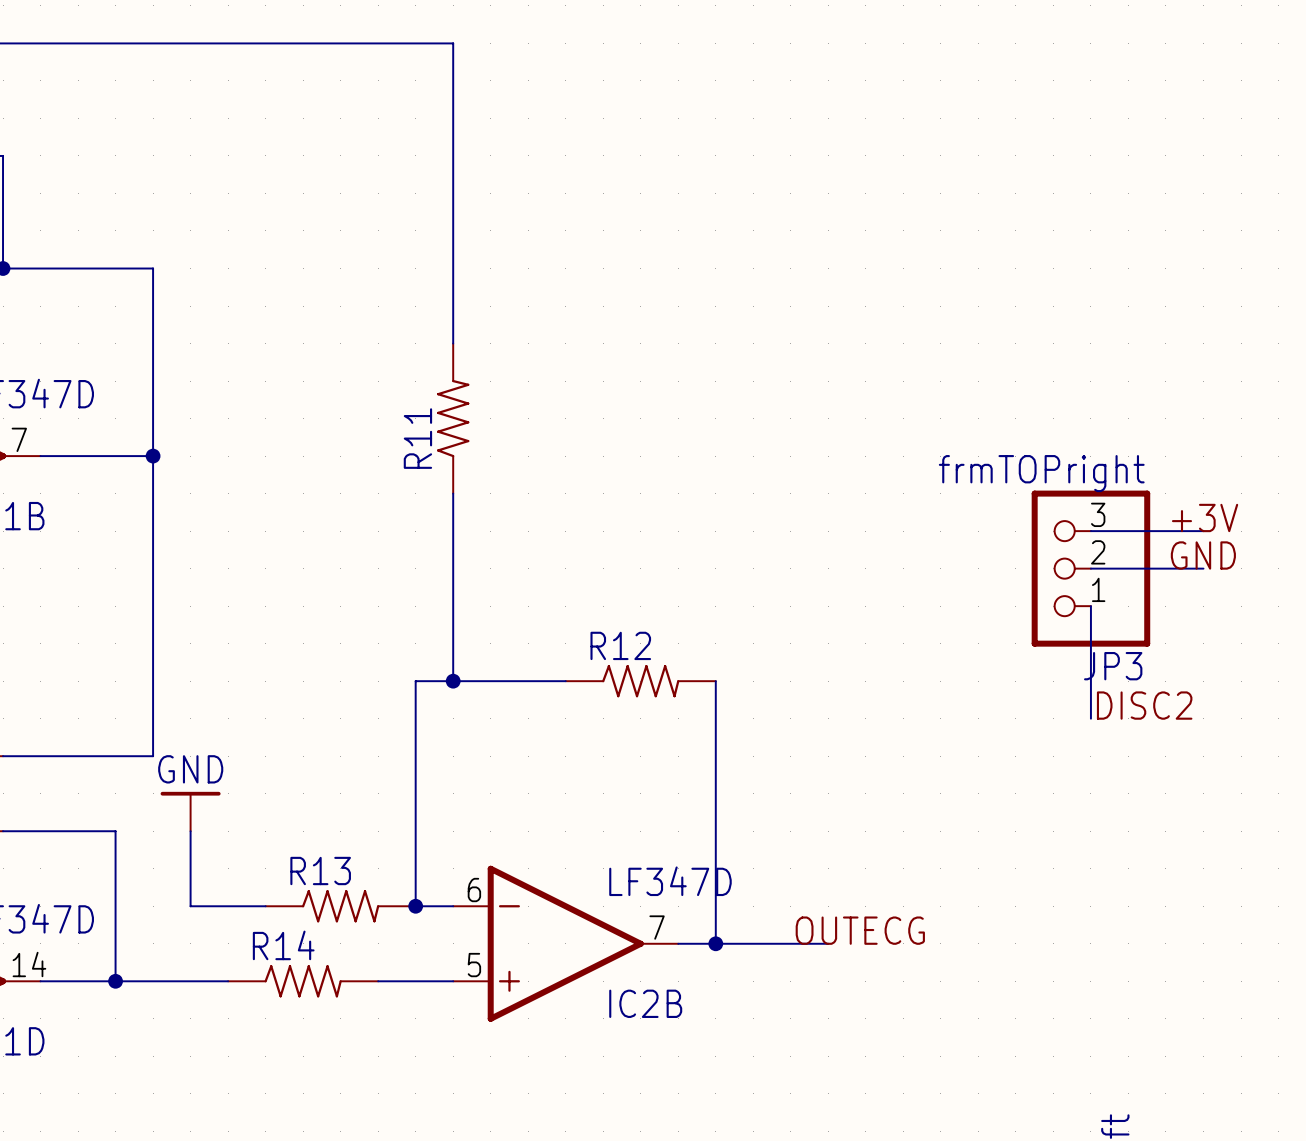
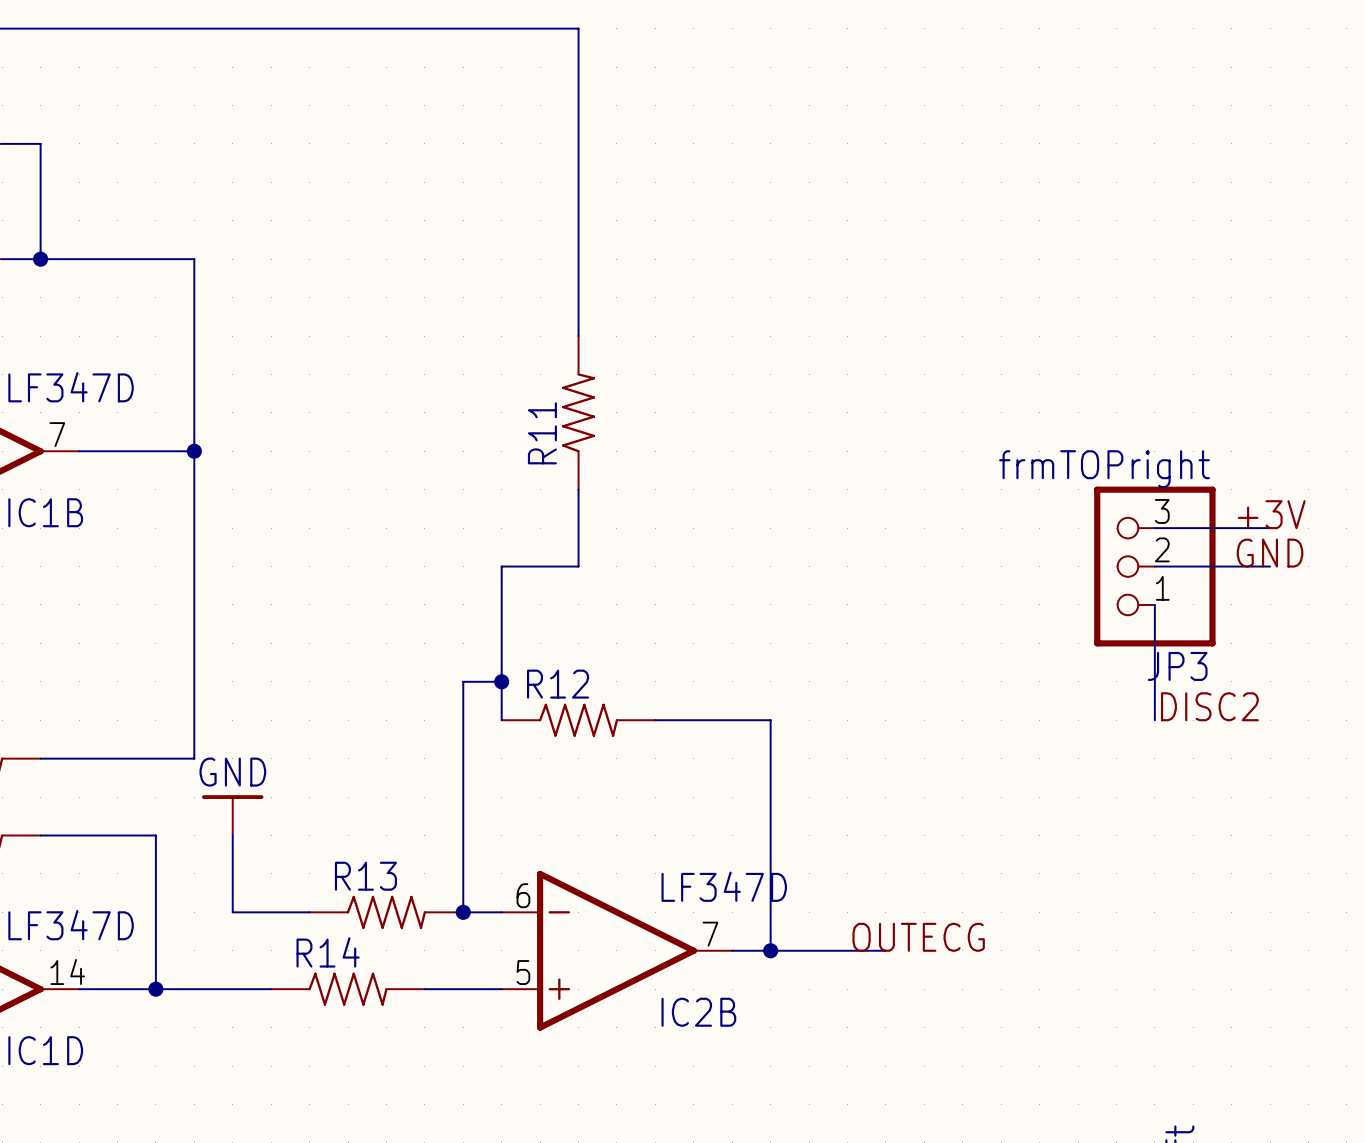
wire: (453, 43) (453, 343) -> (501, 28) (578, 28) (578, 336)
R11 position: (453, 418) -> (578, 412)
wire: (453, 493) (453, 568) -> (578, 489) (578, 566) (501, 566)
wire: (453, 681) (565, 681) -> (501, 681) (501, 720)
R12 position: (640, 681) -> (578, 720)
wire: (715, 681) (715, 718) -> (655, 720) (770, 720)

